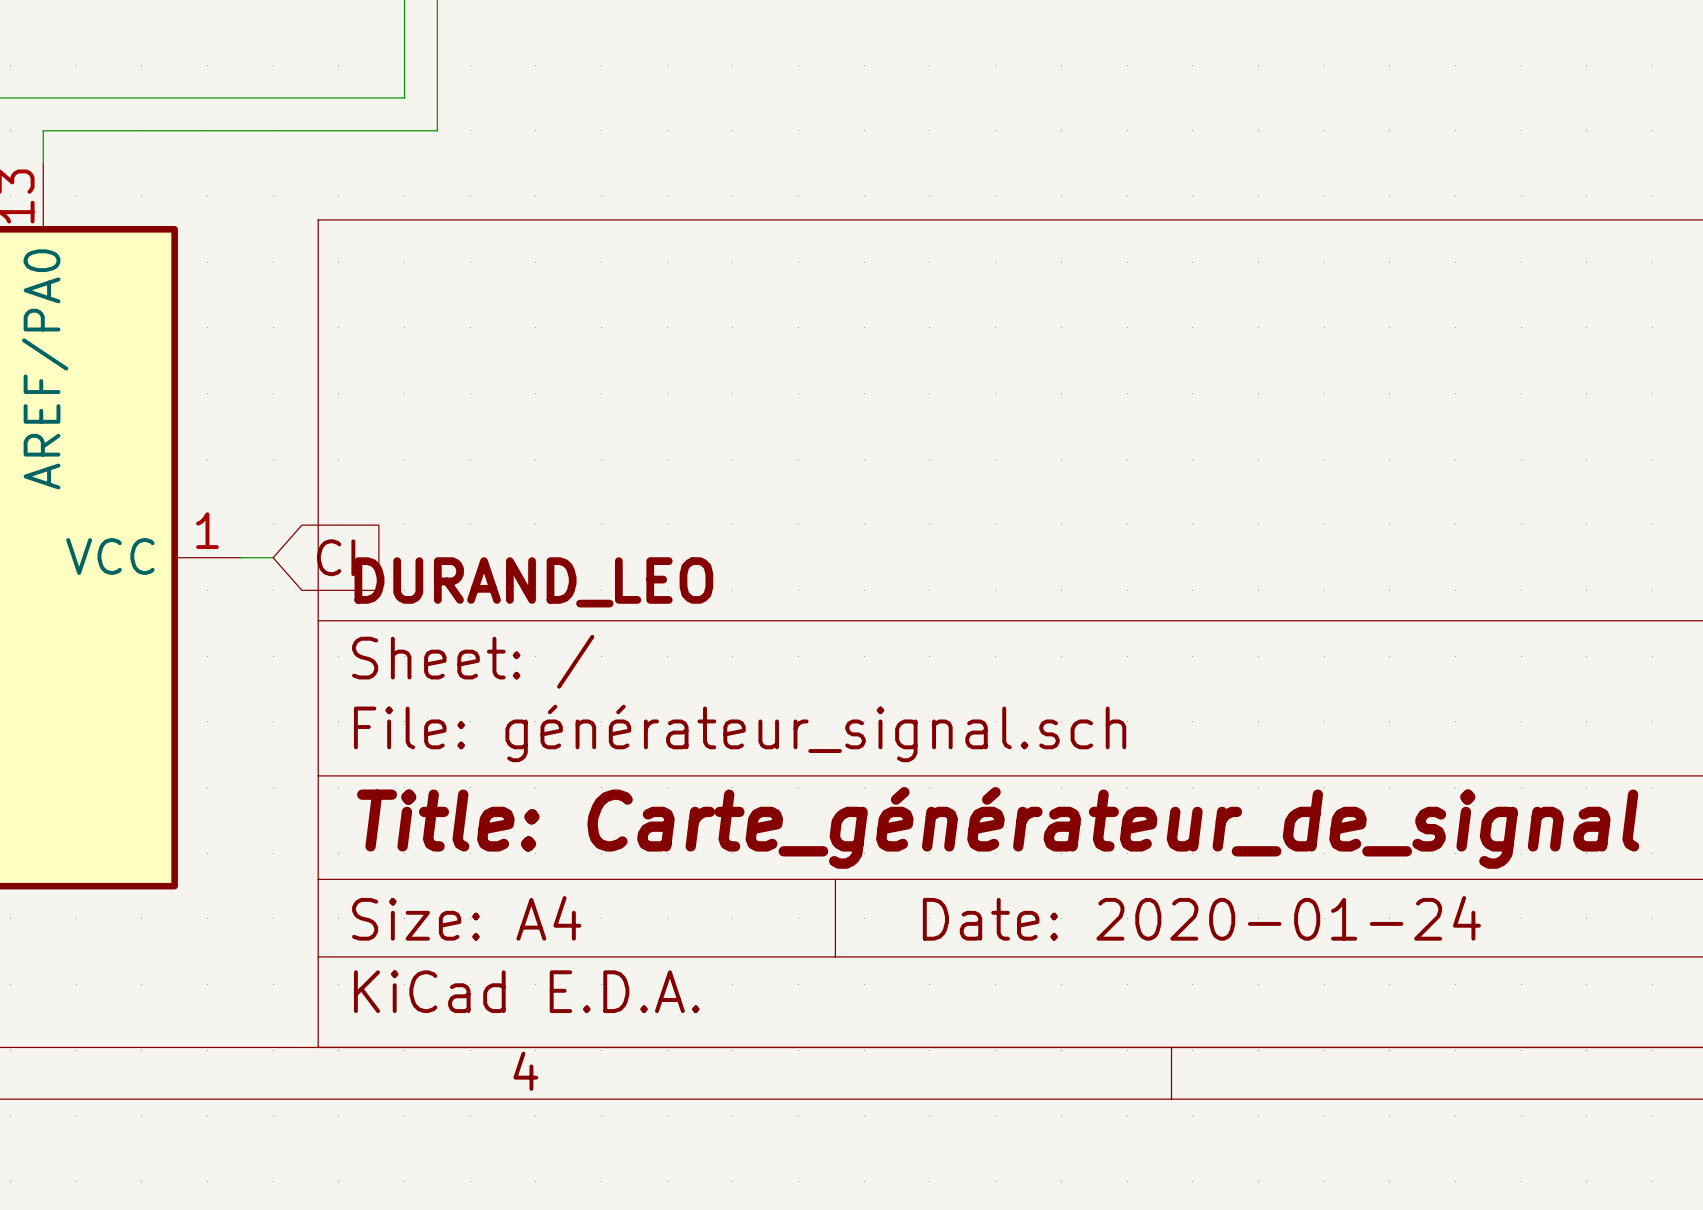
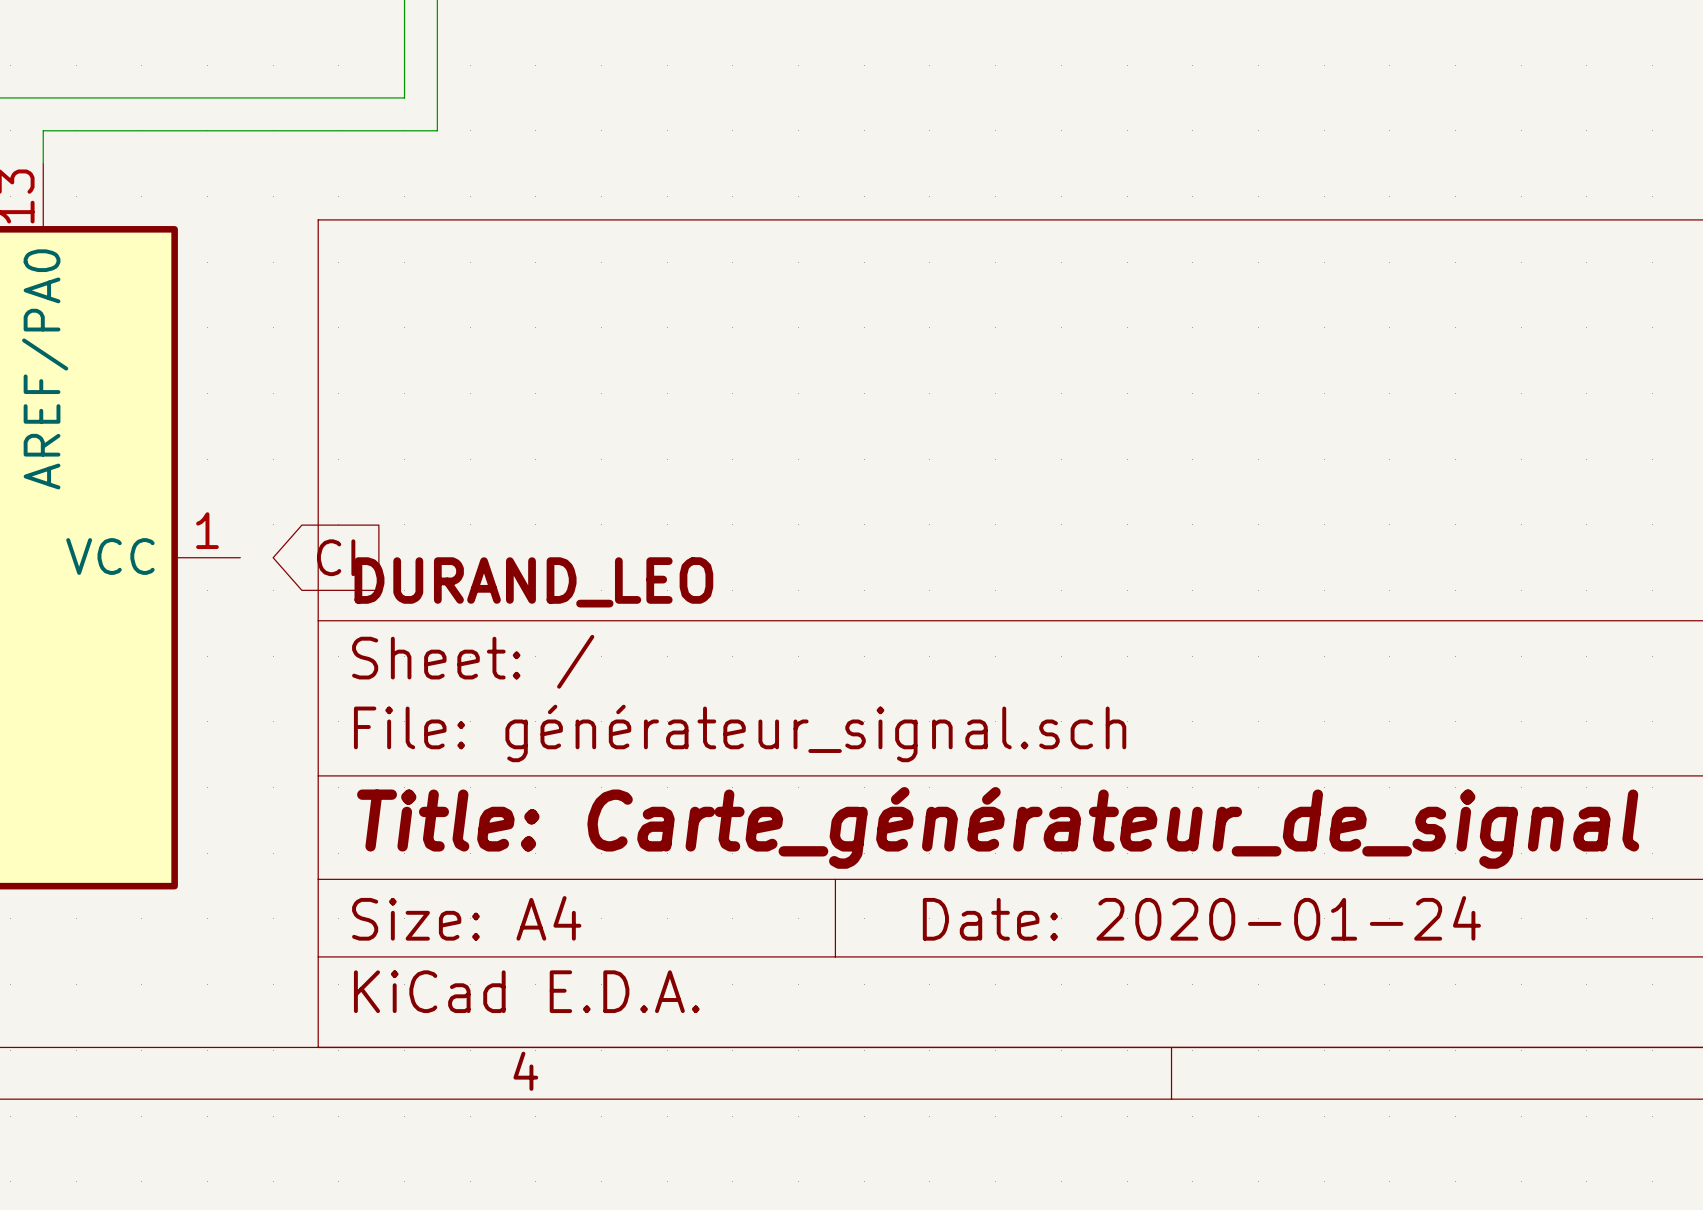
wire: (240, 557) (273, 557) -> none

